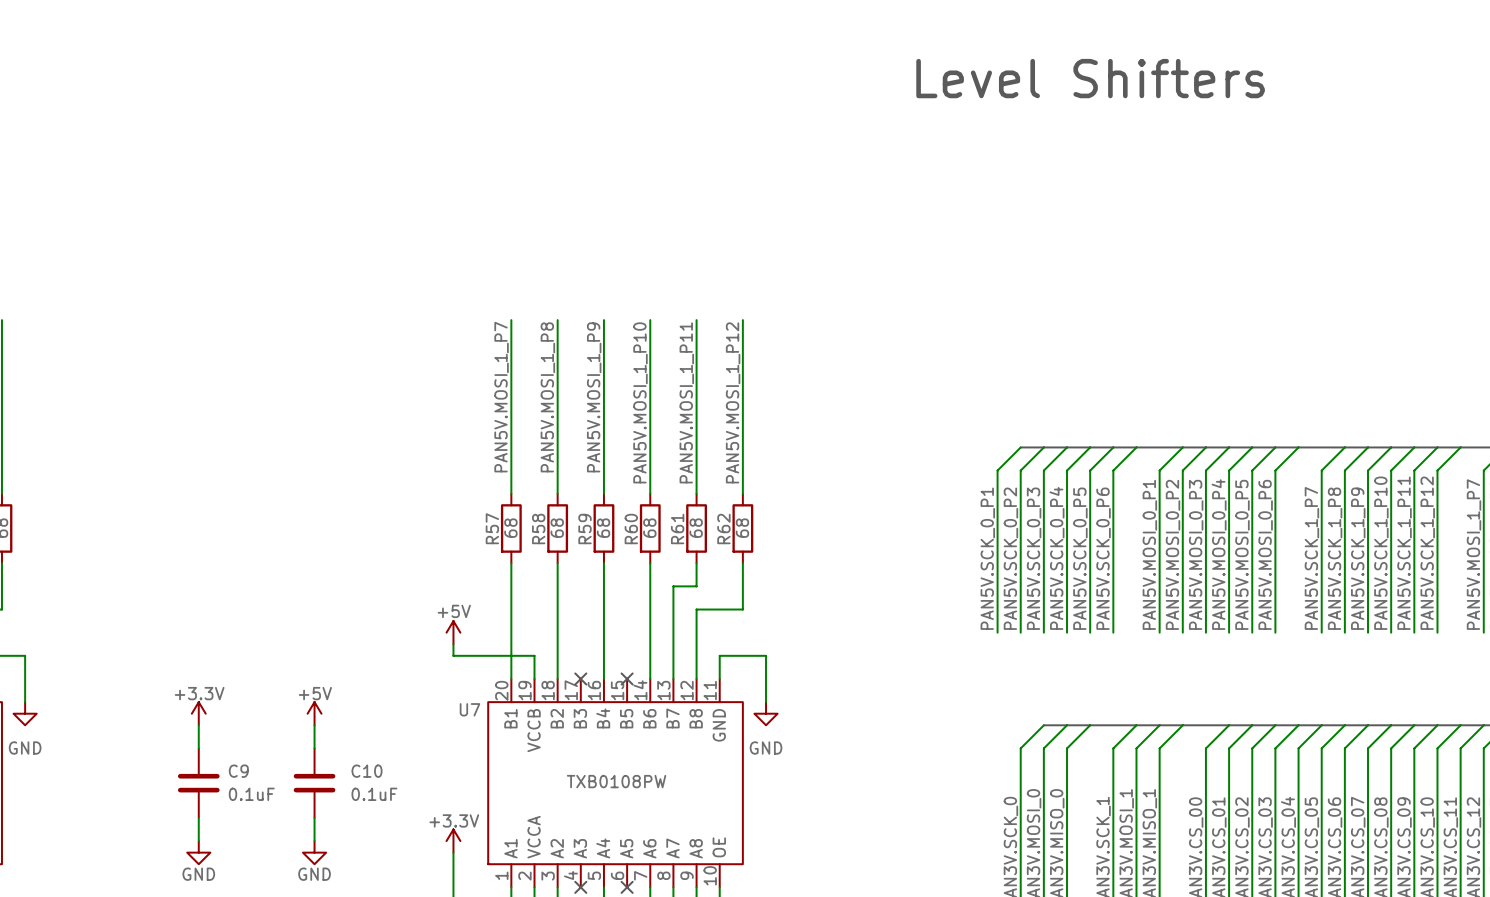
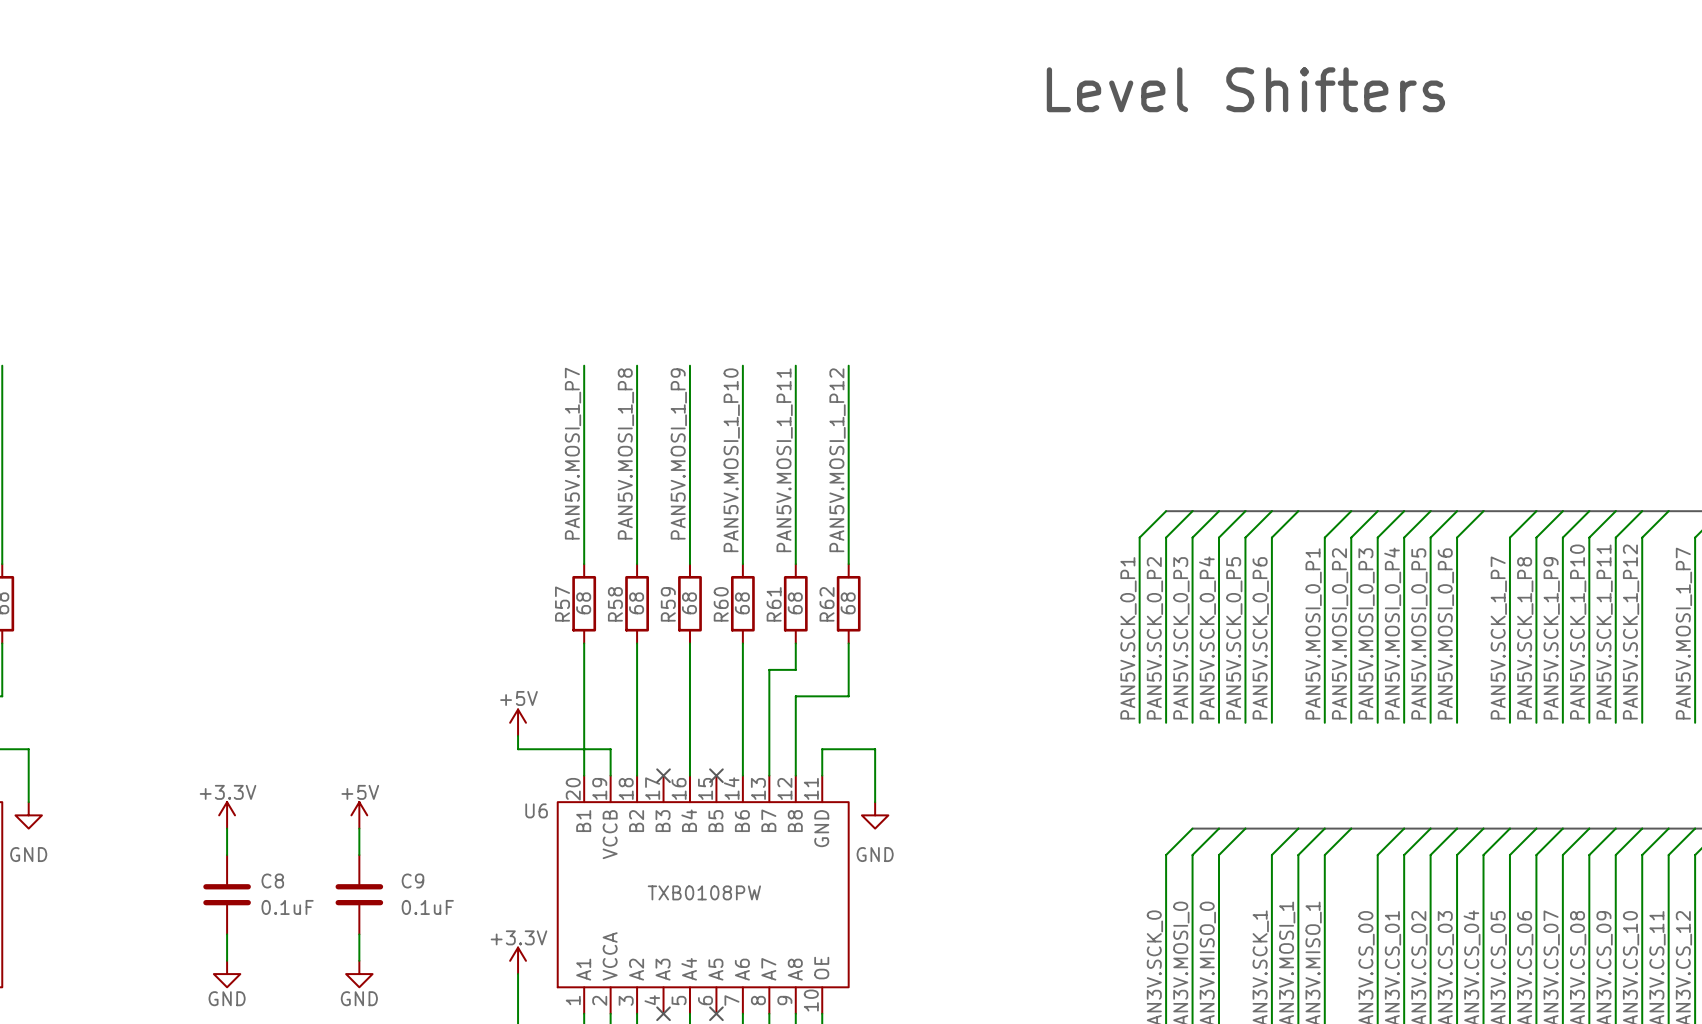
U7 name: U7 (469, 709) -> U6 (536, 810)
C9 name: C9 (238, 771) -> C8 (272, 881)
C10 name: C10 (367, 771) -> C9 (412, 881)

